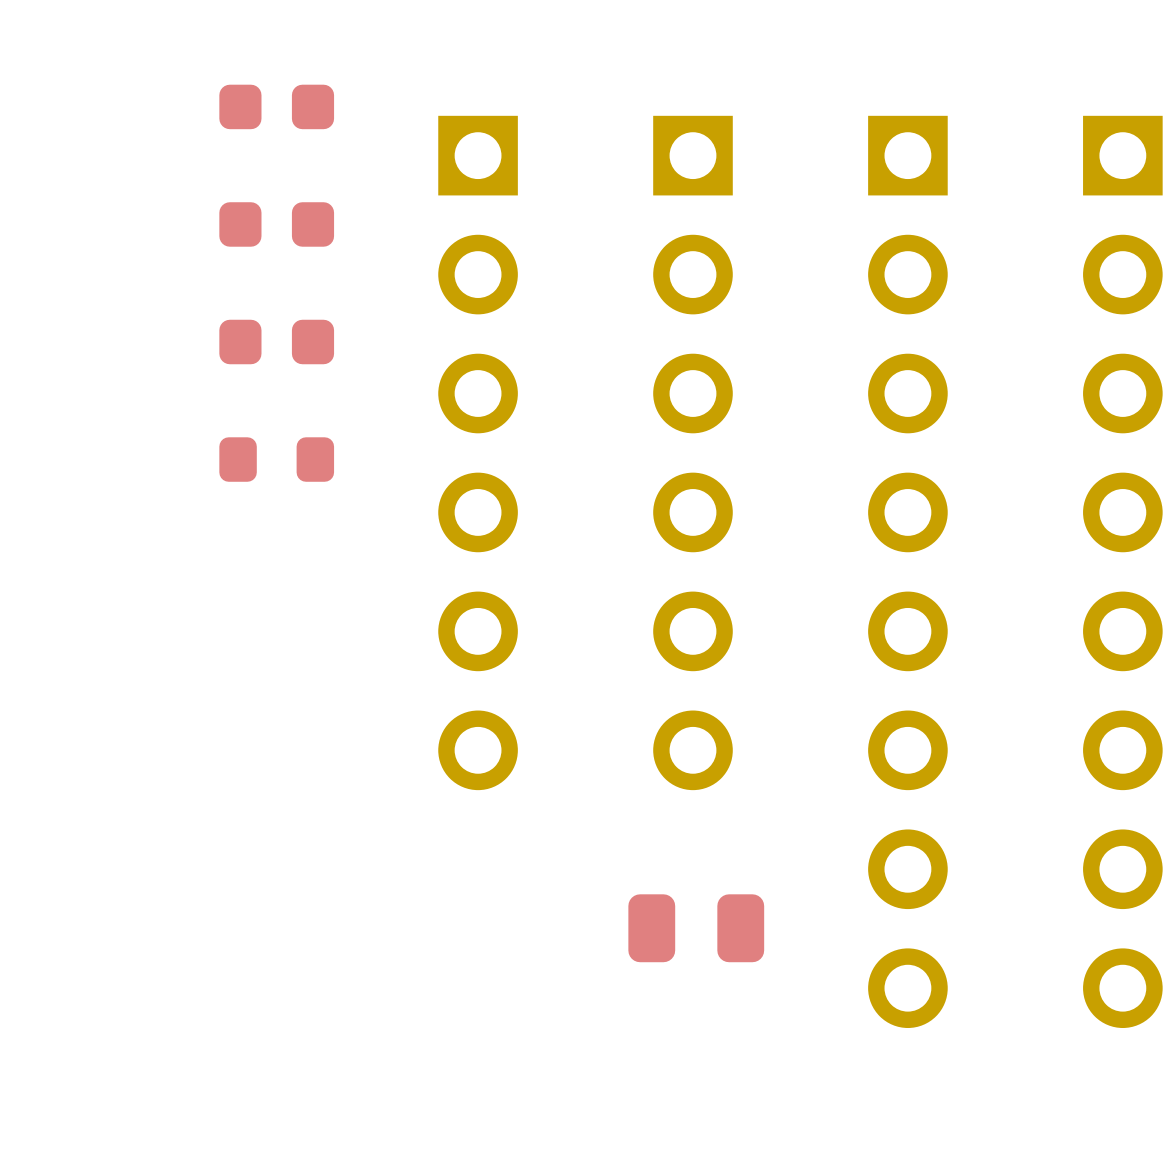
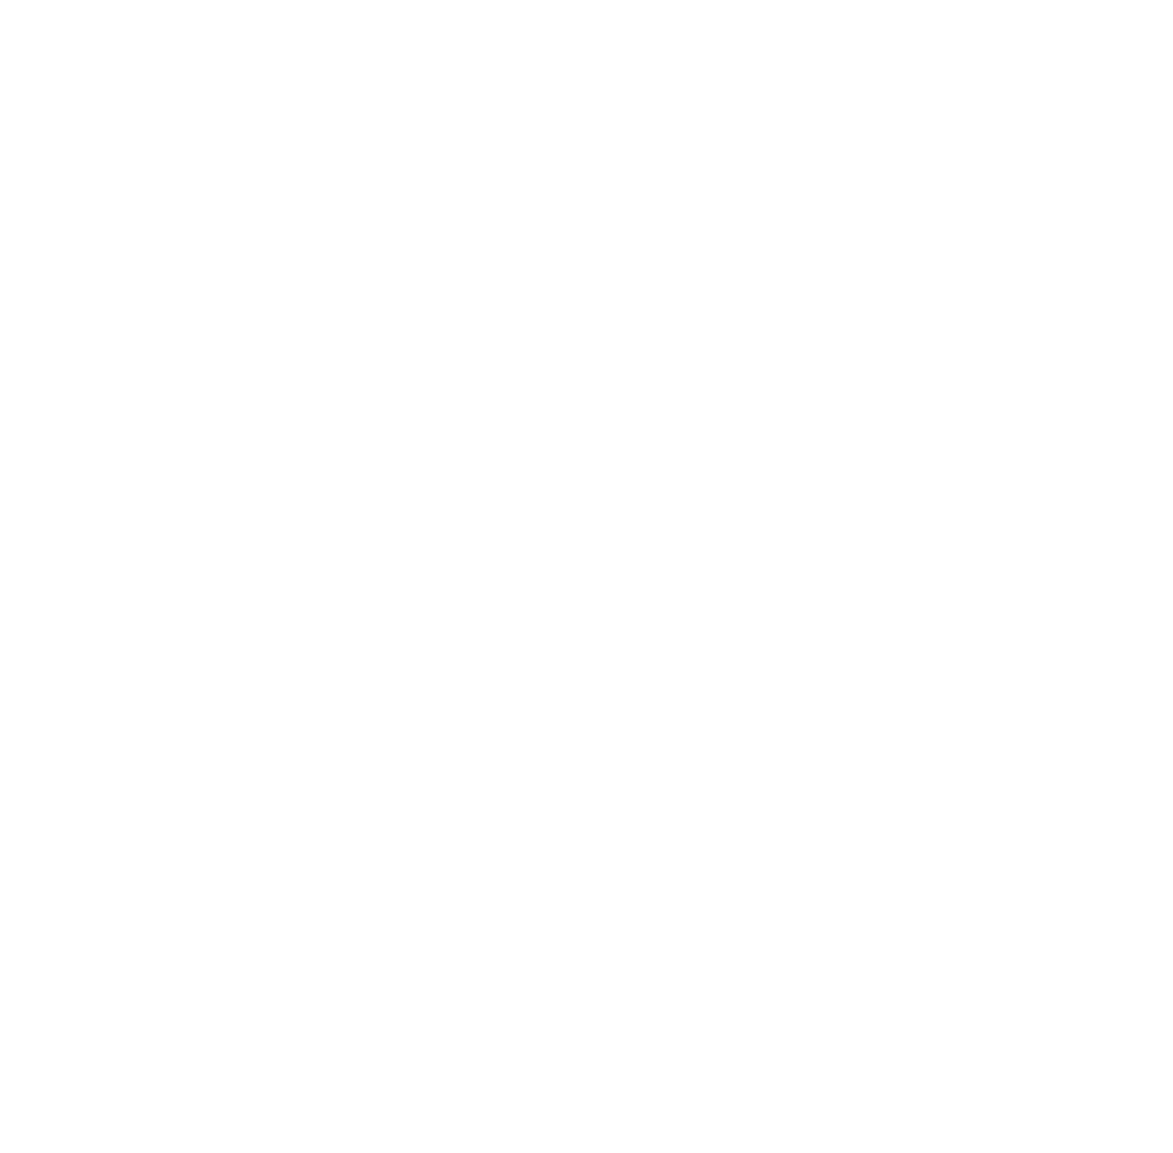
part: (276, 106) -> none
part: (276, 224) -> none
part: (276, 342) -> none
part: (478, 452) -> none
part: (692, 452) -> none
part: (276, 459) -> none
part: (907, 571) -> none
part: (1122, 571) -> none
part: (696, 928) -> none

